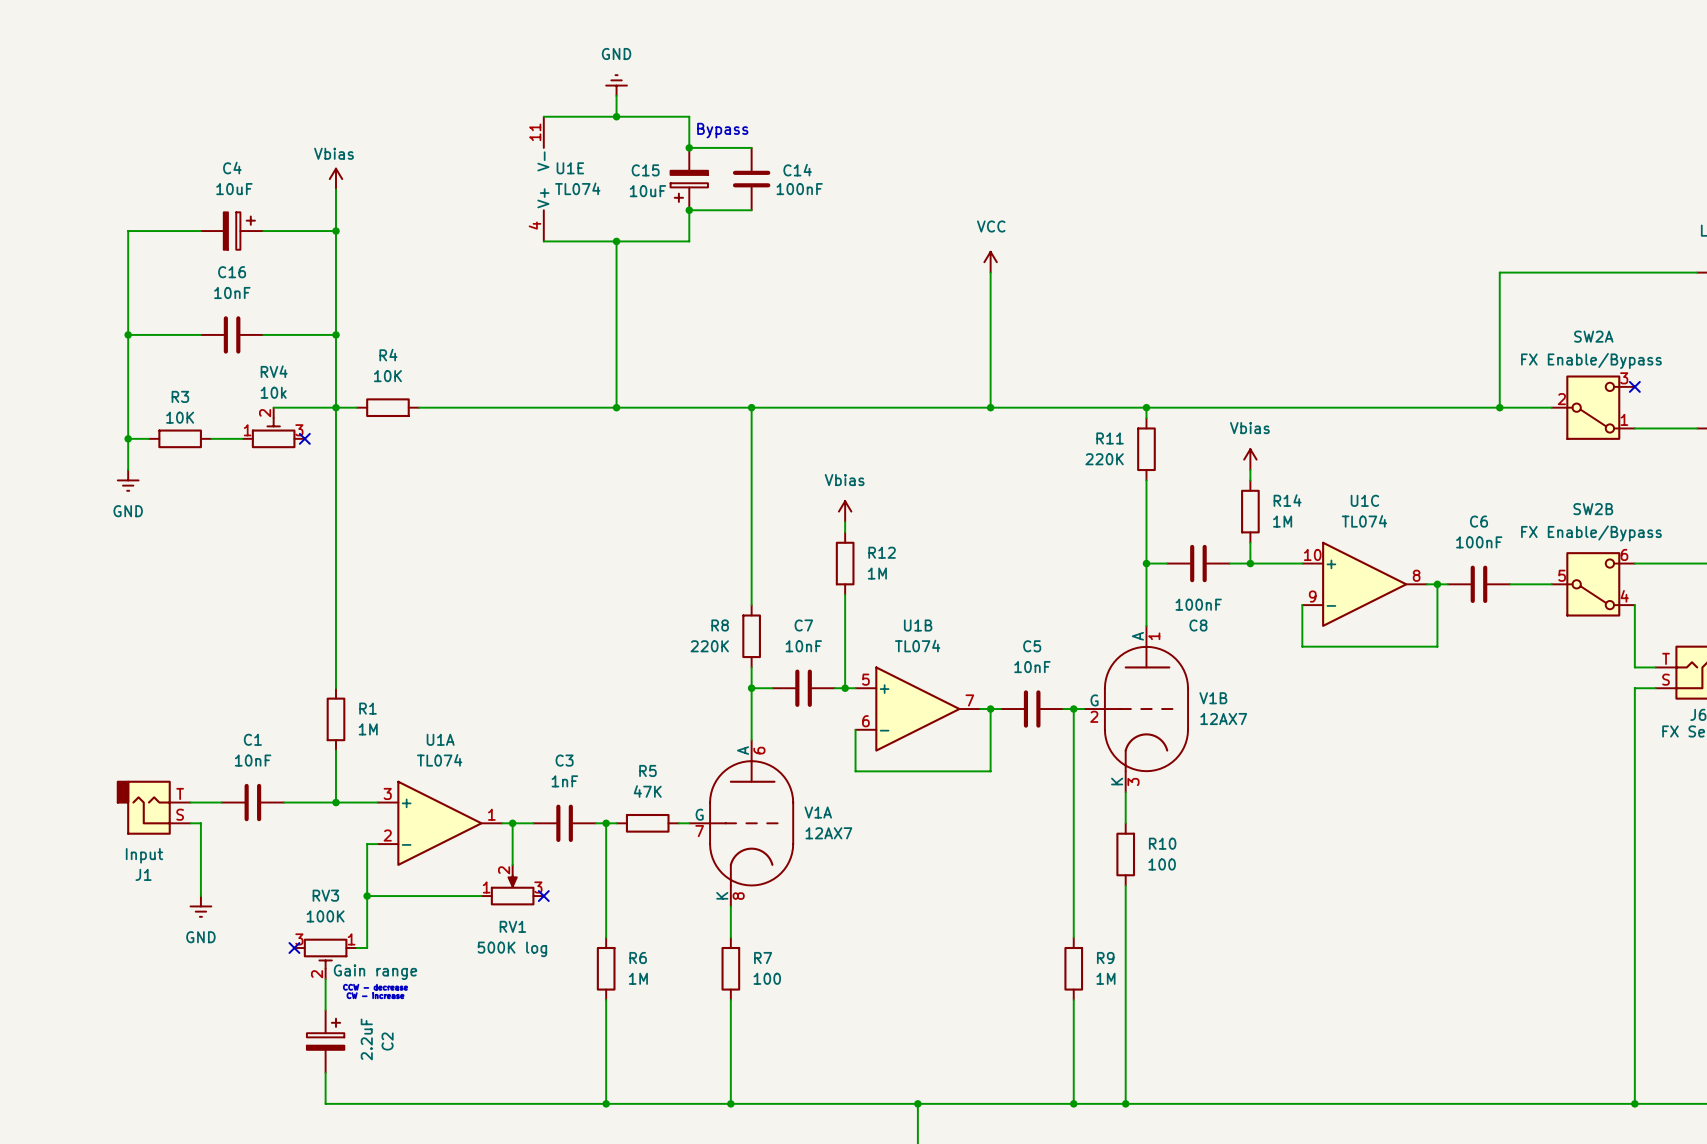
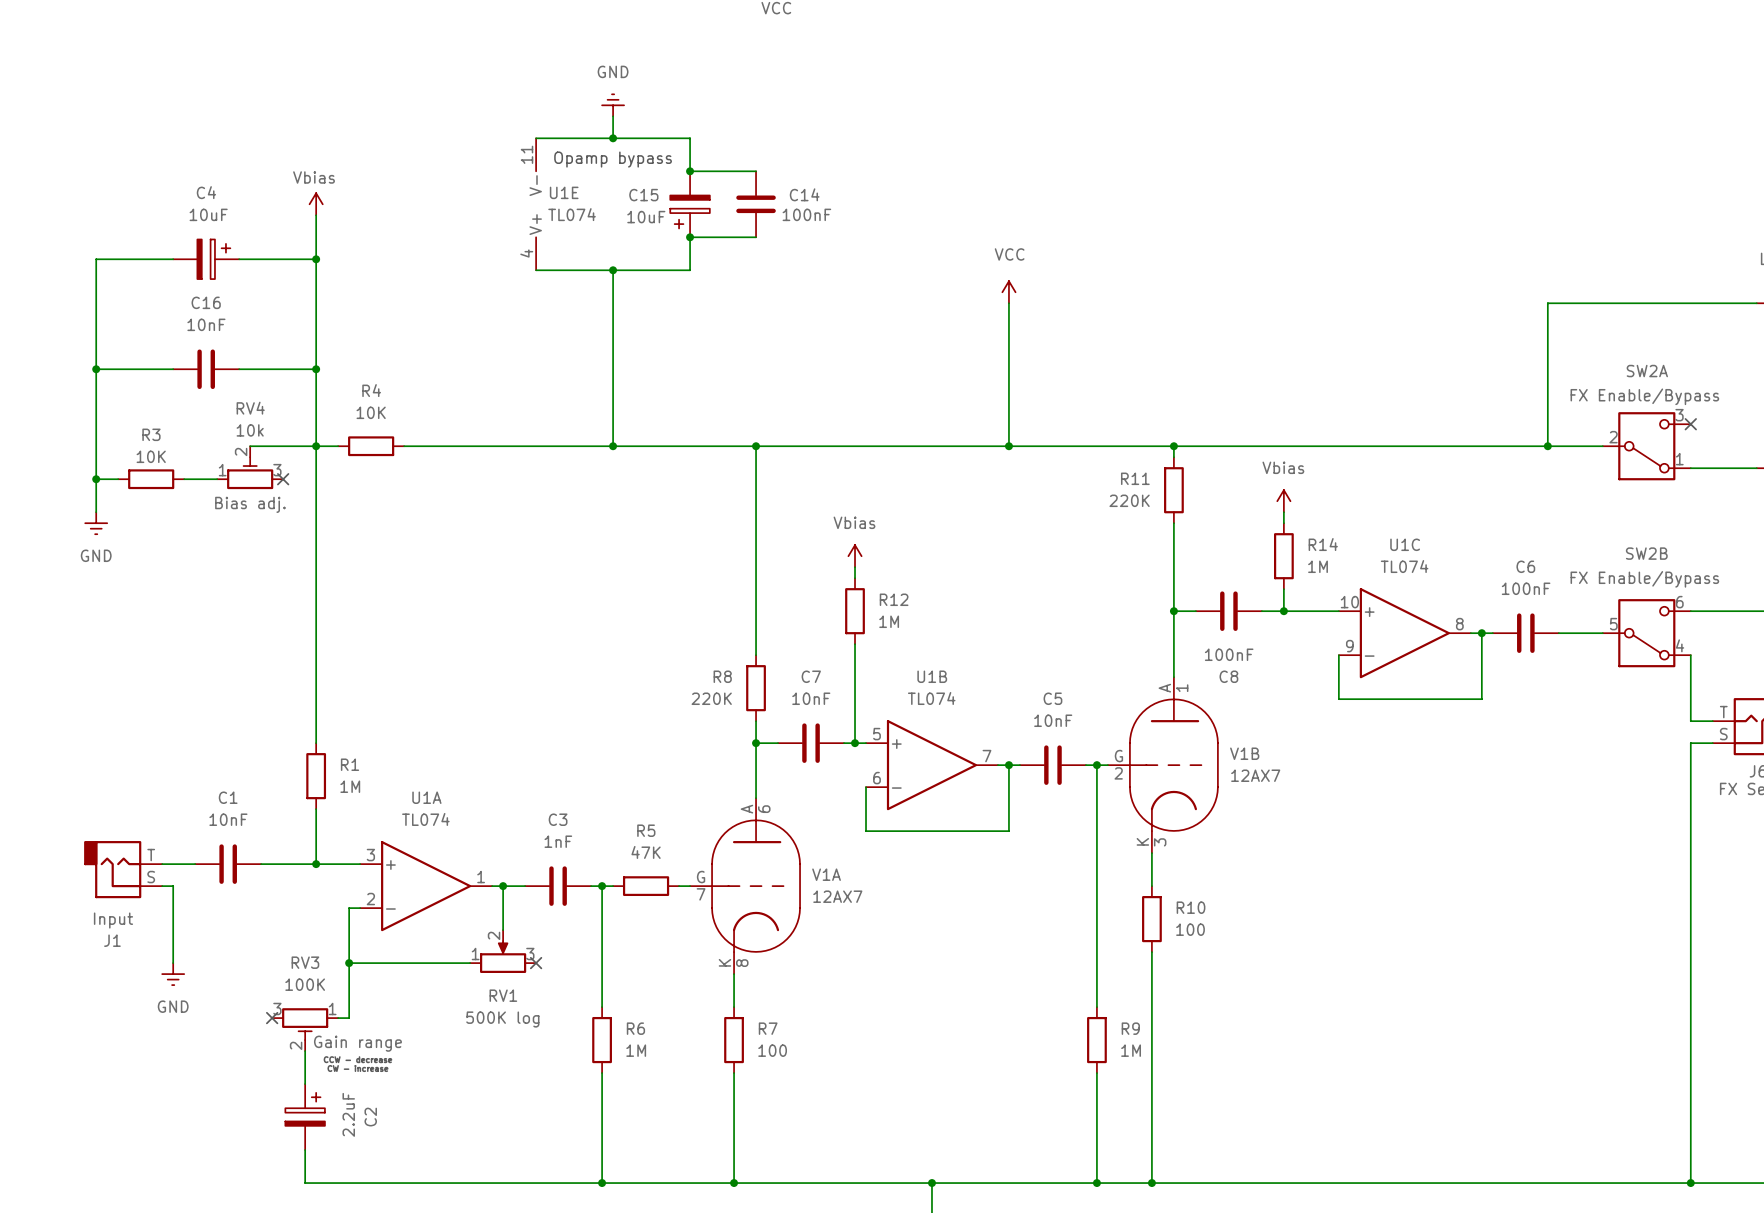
text: Bypass (722, 130) -> none
text: none -> Opamp bypass (613, 159)
RV4 text: none -> Bias adj. (250, 504)

